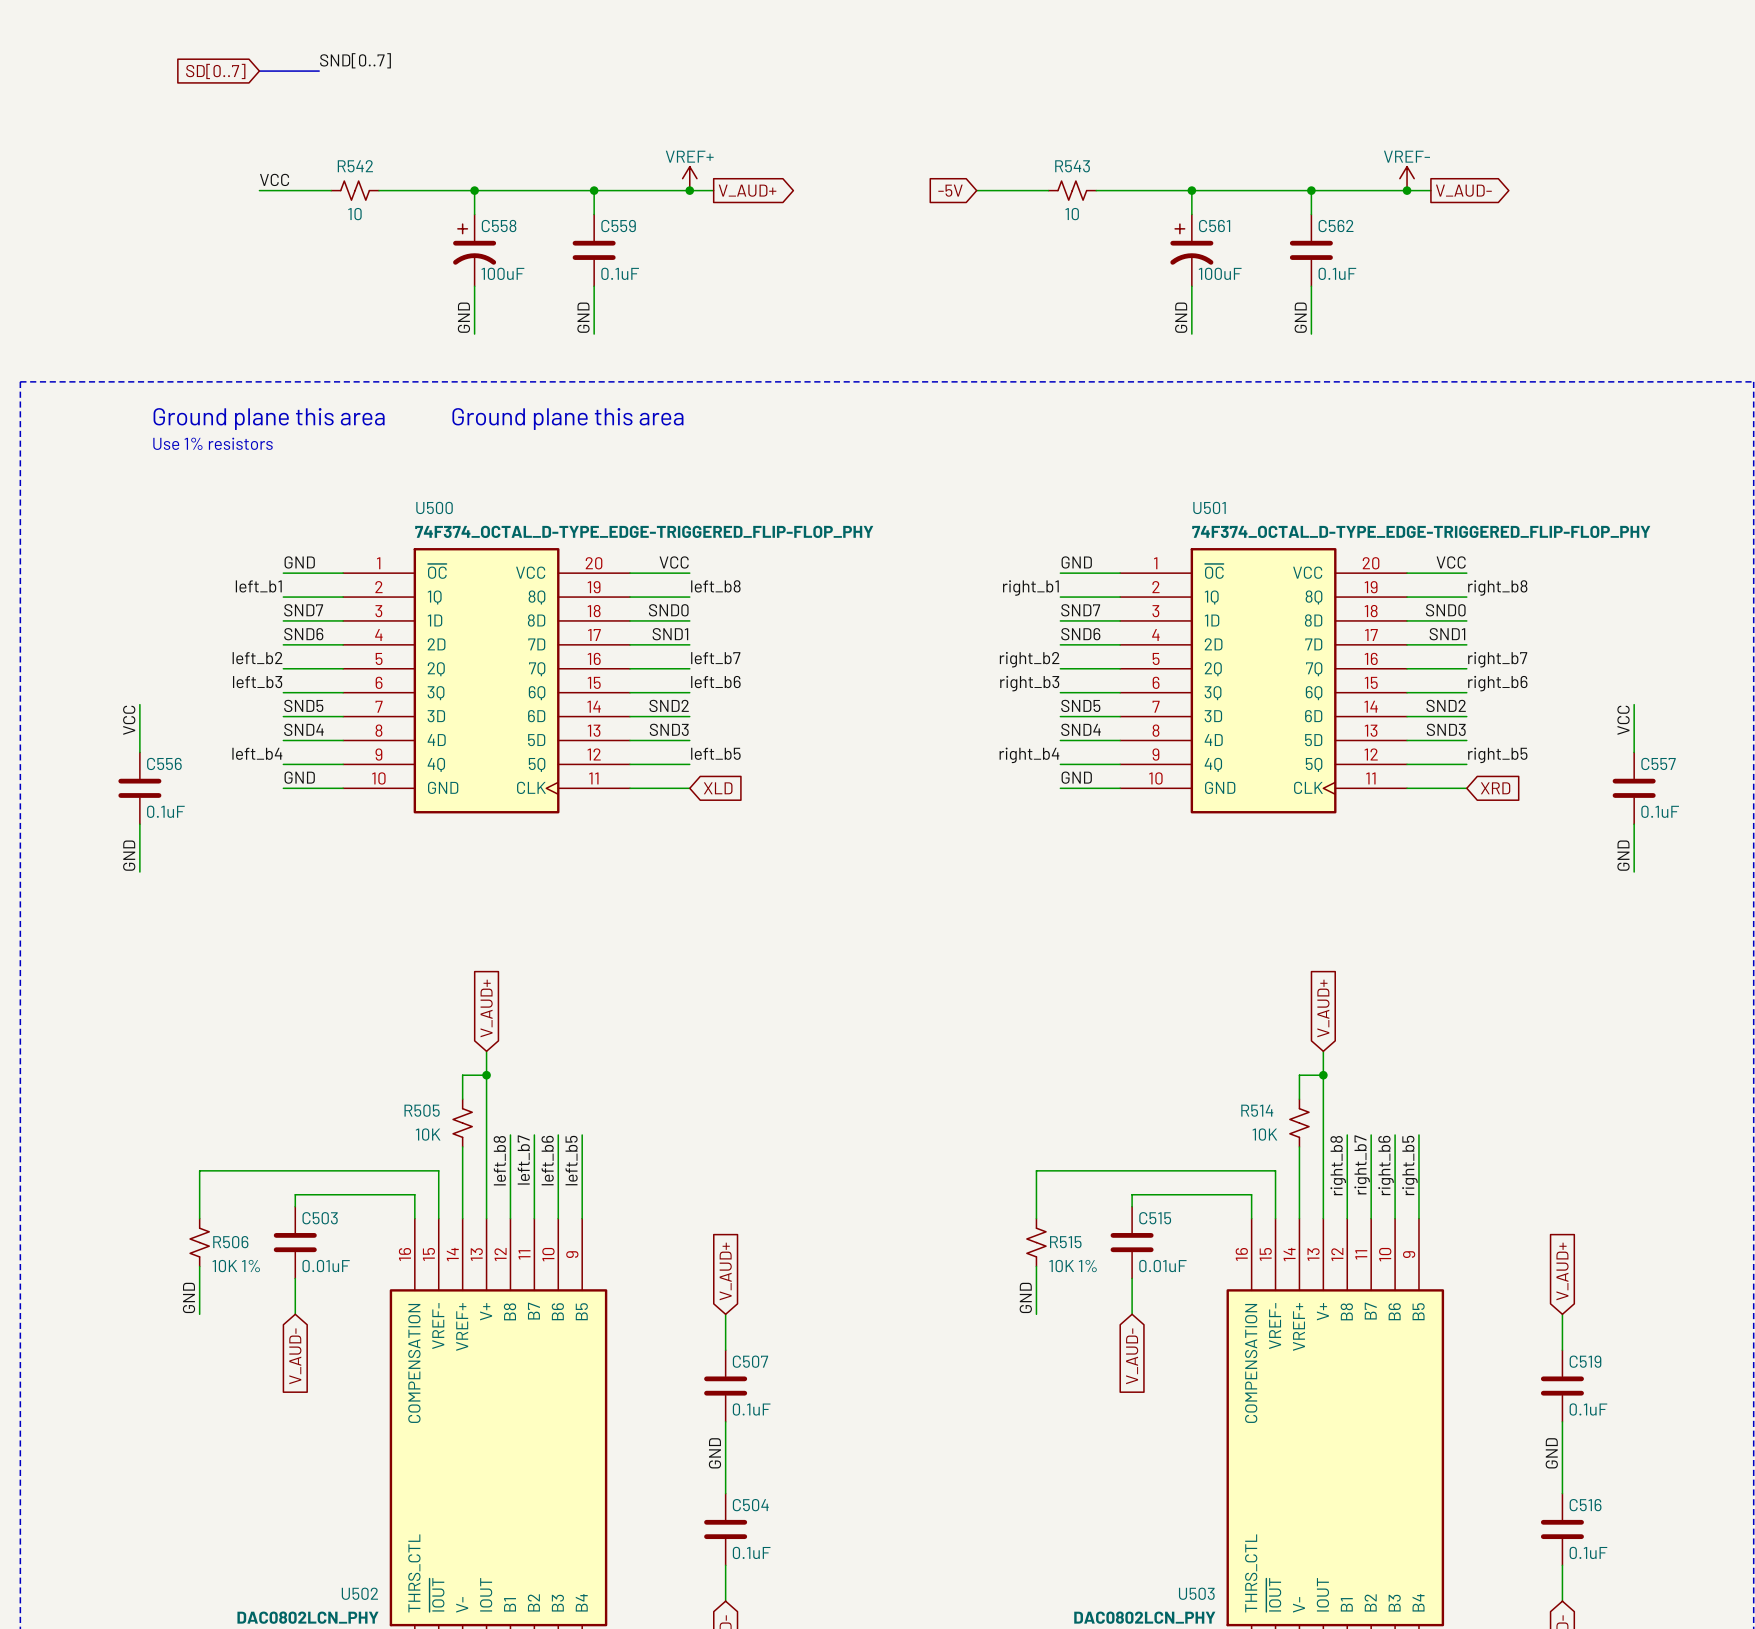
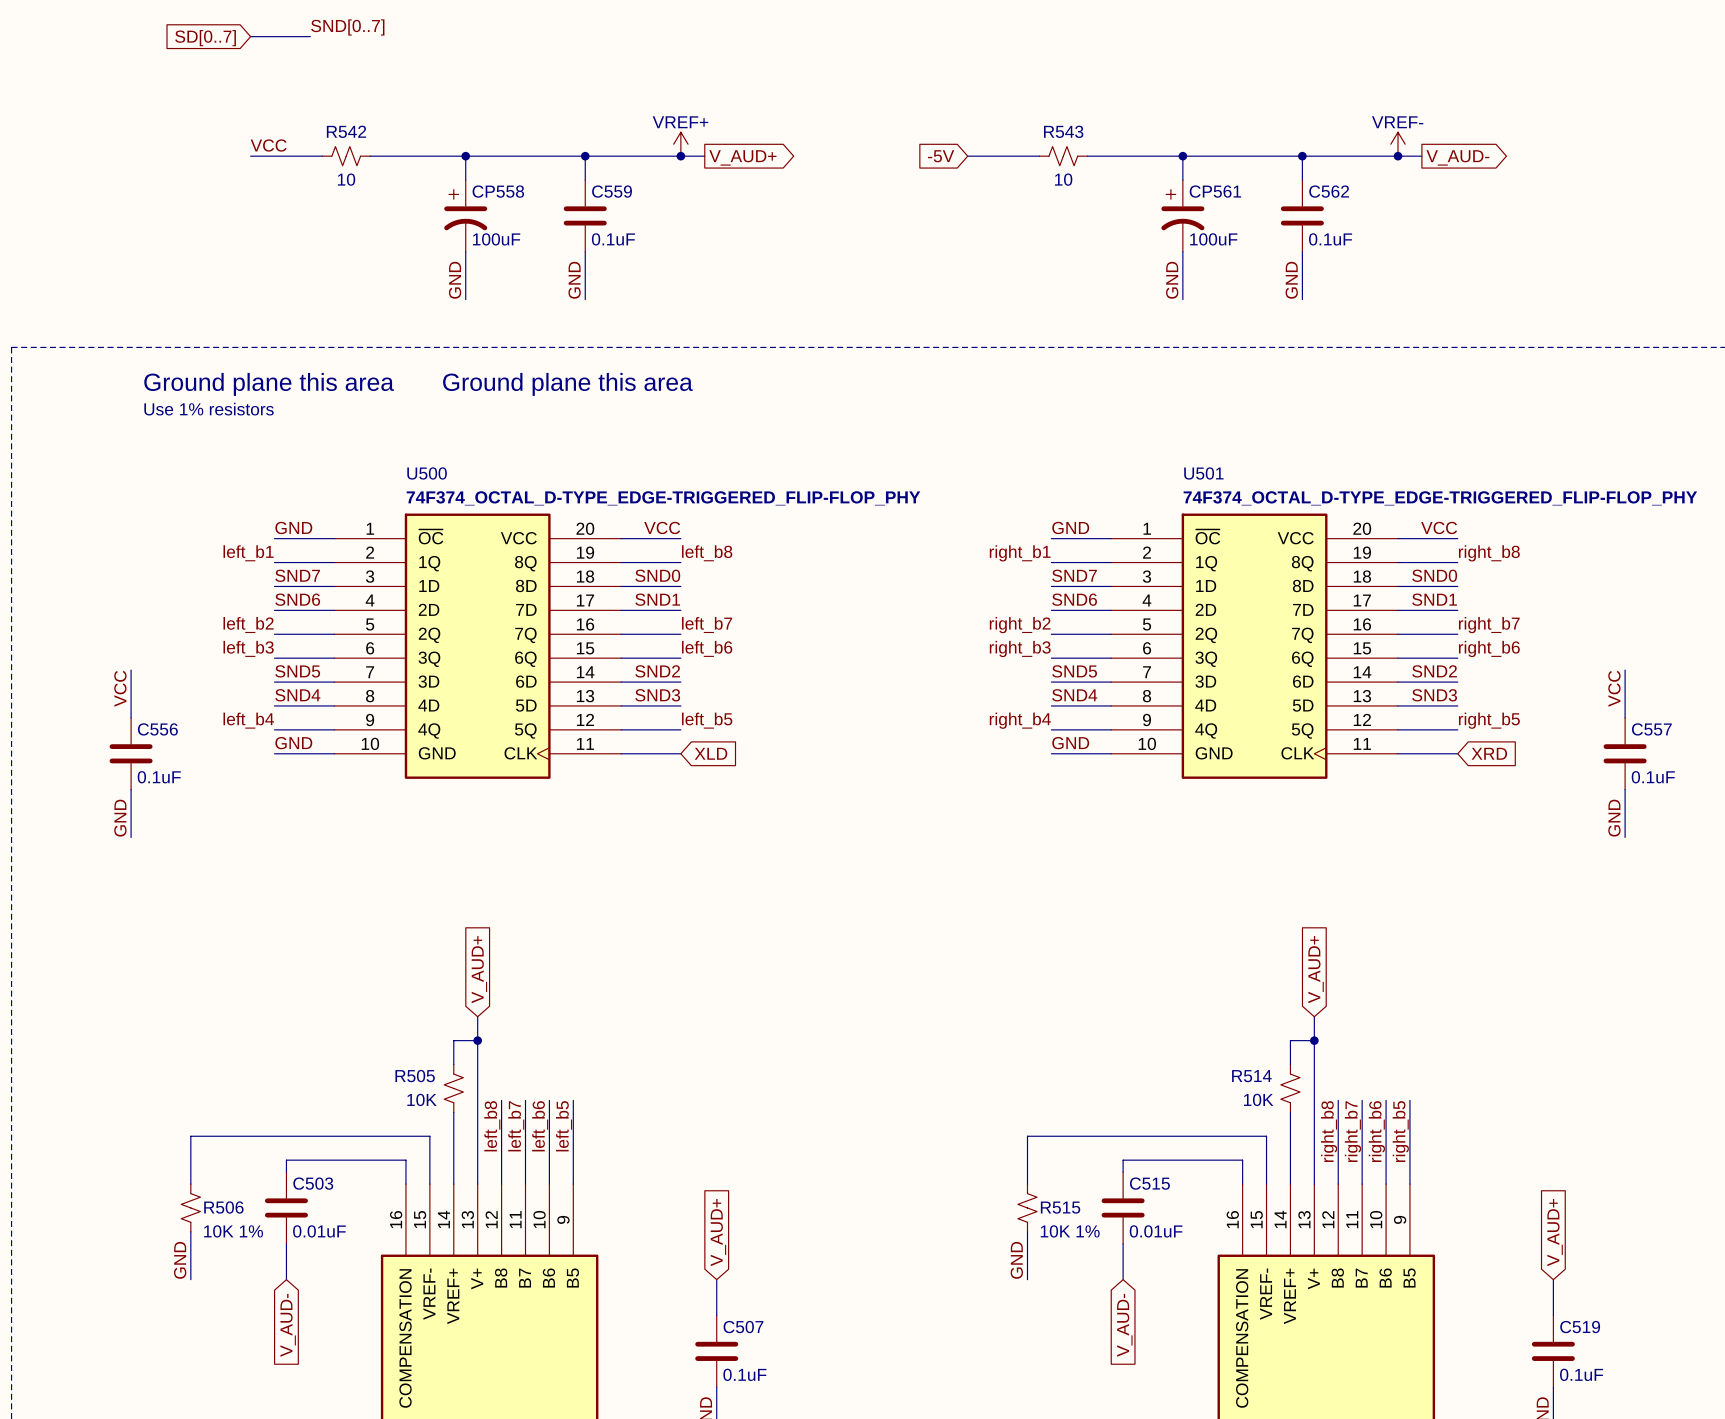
C558 name: C558 (499, 226) -> CP558 (498, 191)
C561 name: C561 (1214, 226) -> CP561 (1215, 191)

